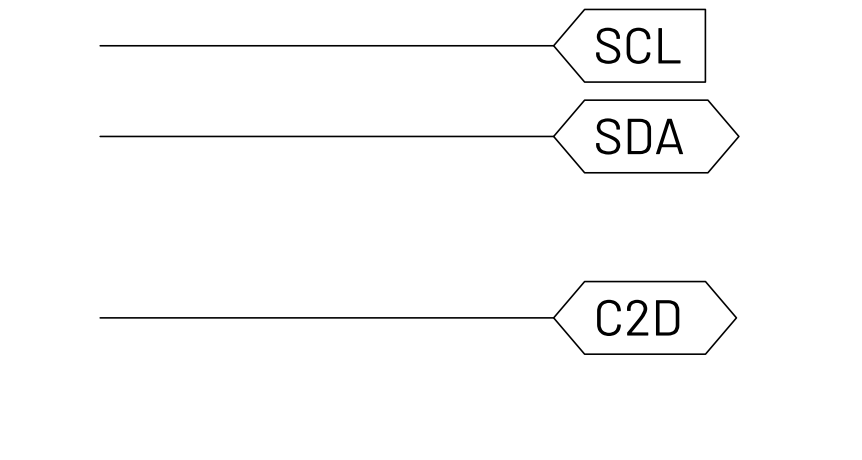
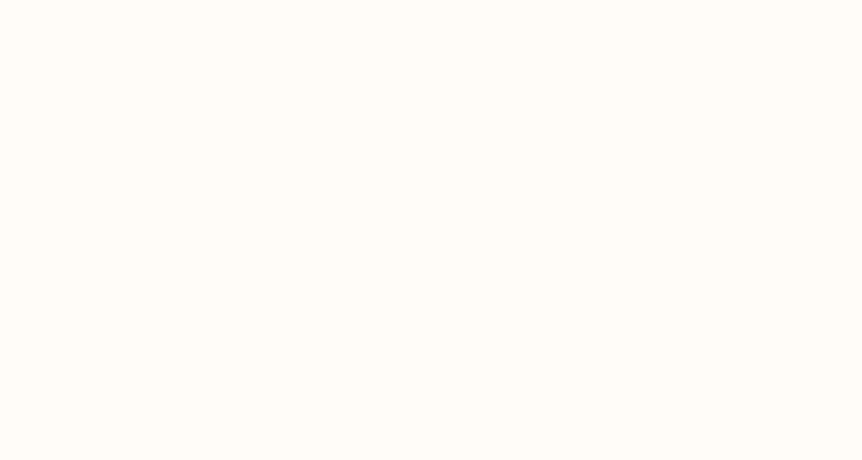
wire: (100, 45) (553, 45) -> none
global label: SCL (638, 45) -> none
wire: (100, 136) (553, 136) -> none
global label: SDA (639, 136) -> none
wire: (100, 317) (553, 317) -> none
global label: C2D (638, 317) -> none

